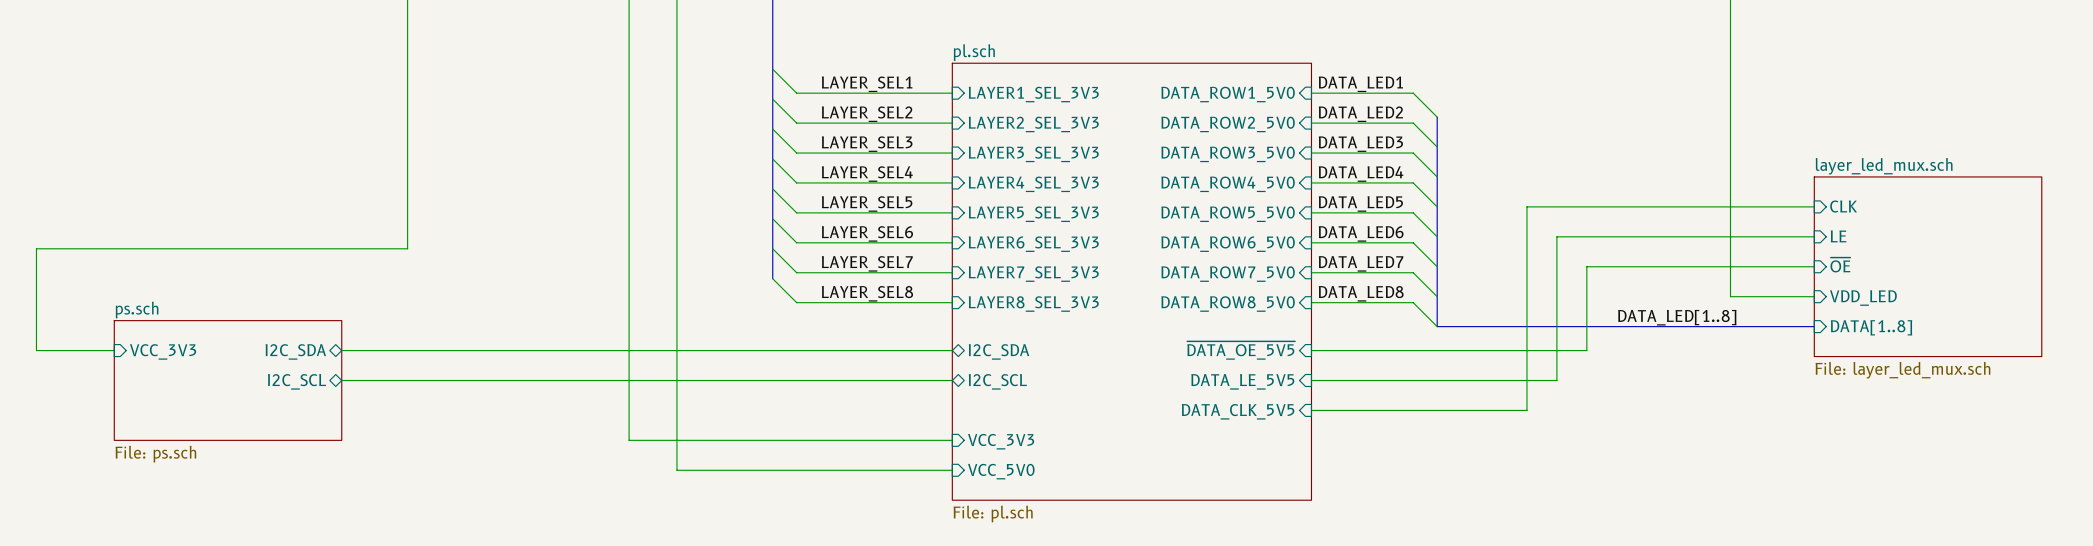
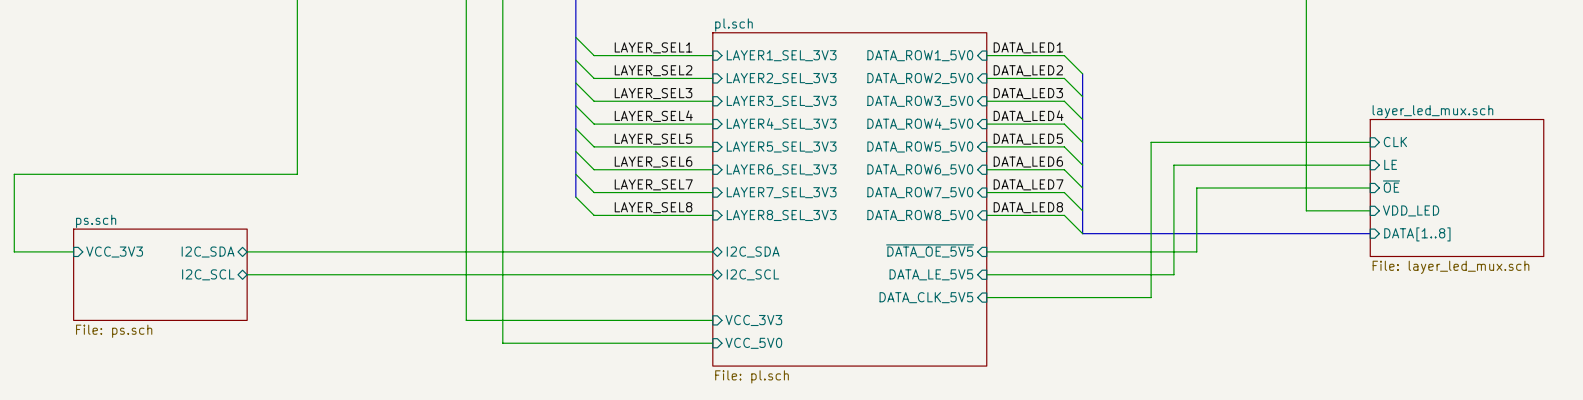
label: DATA_LED[1..8] (1677, 317) -> none

